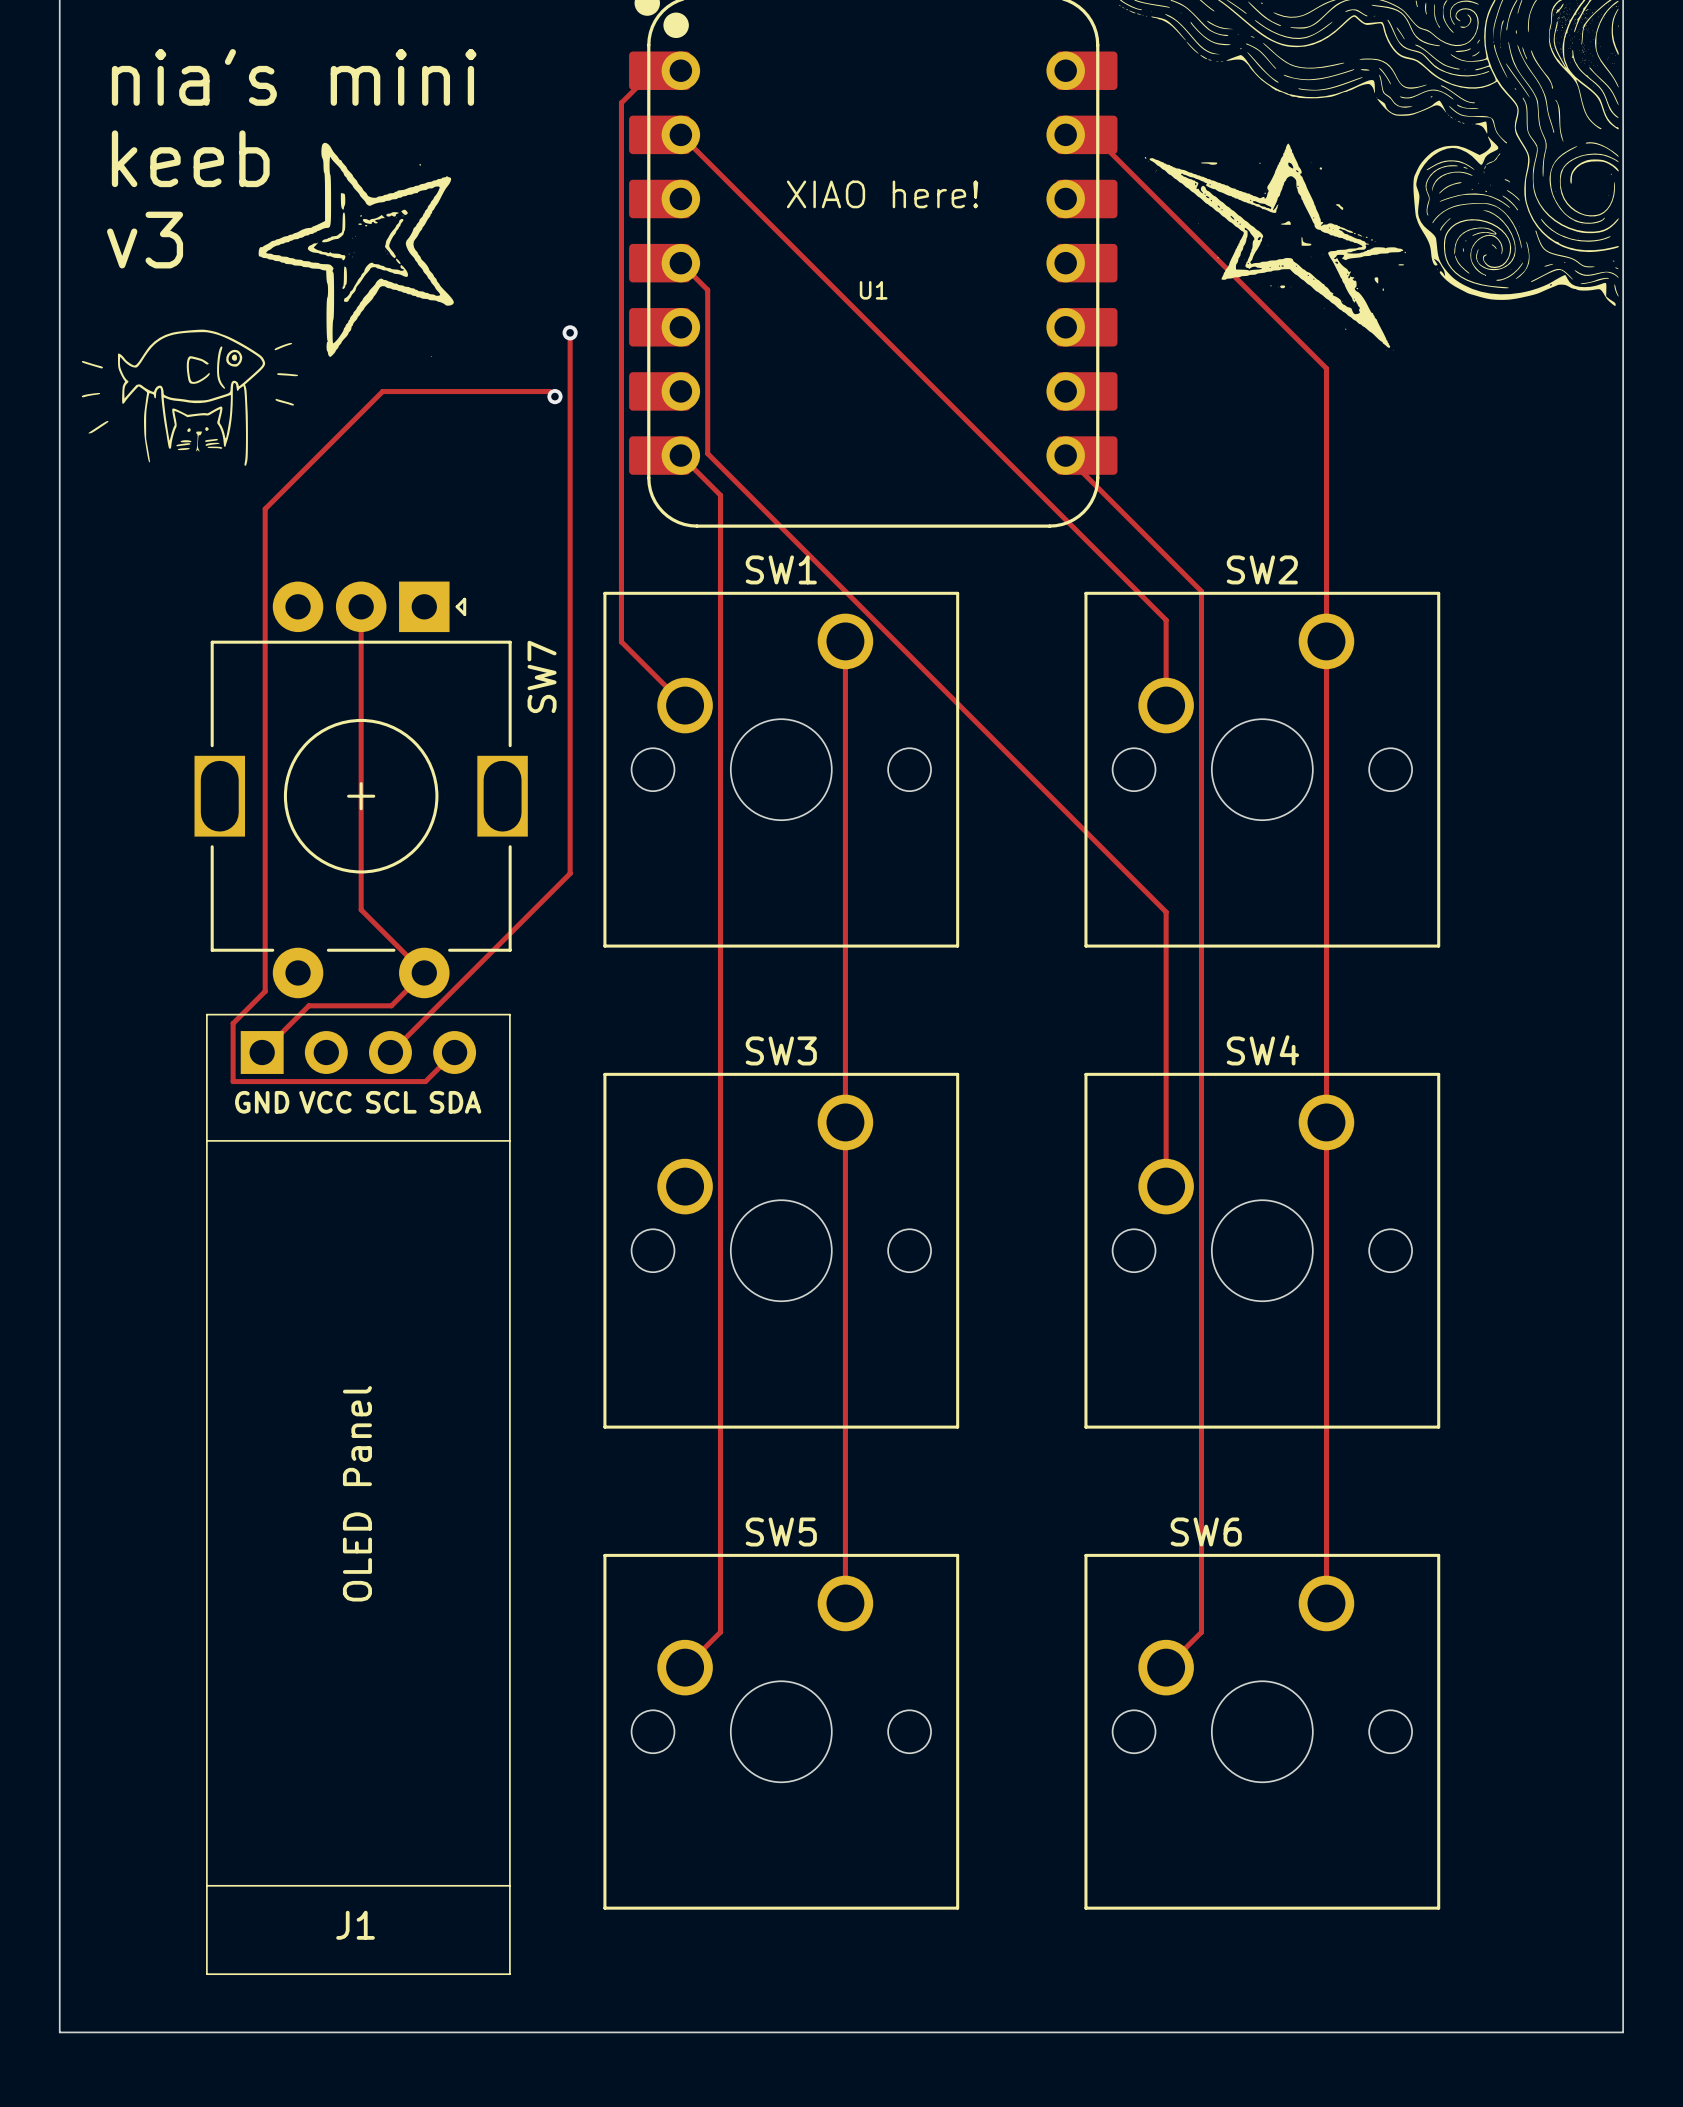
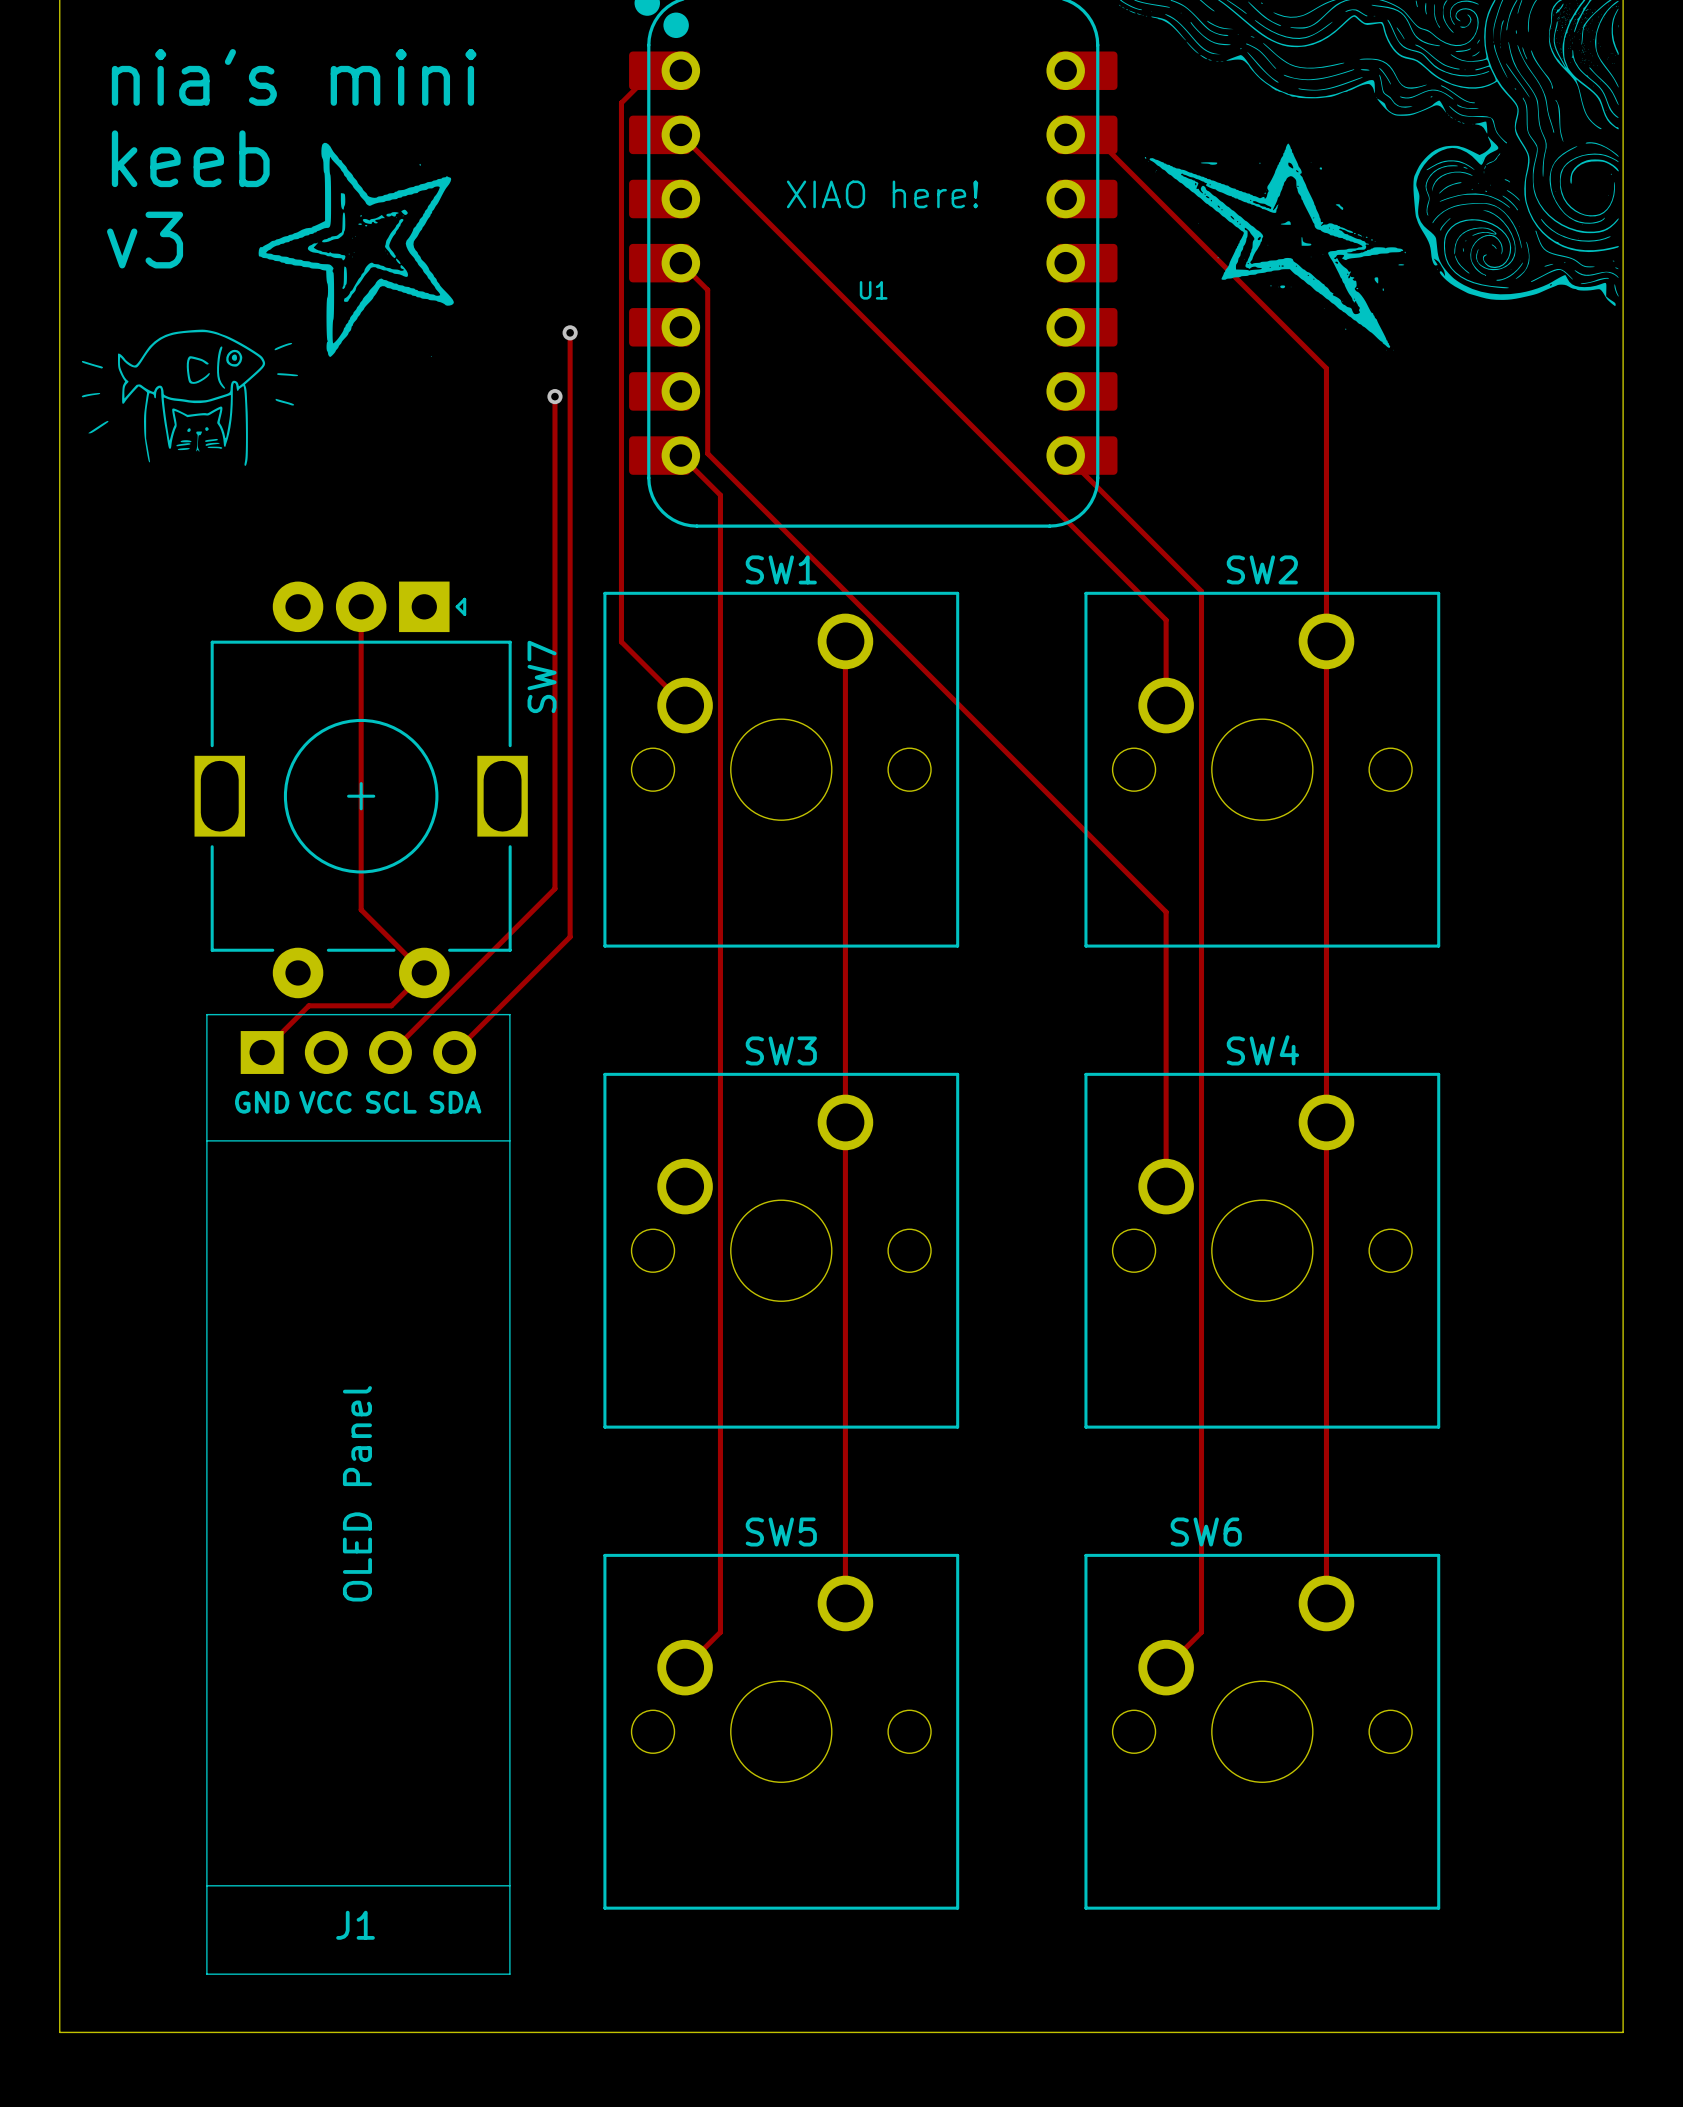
track: (554, 396) (549, 391) (382, 391) (265, 508) (265, 991) (233, 1023) (233, 1081) (425, 1081) (454, 1052) -> (554, 396) (554, 888)
track: (570, 873) (554, 888) -> (570, 873) (570, 936) (454, 1052)

